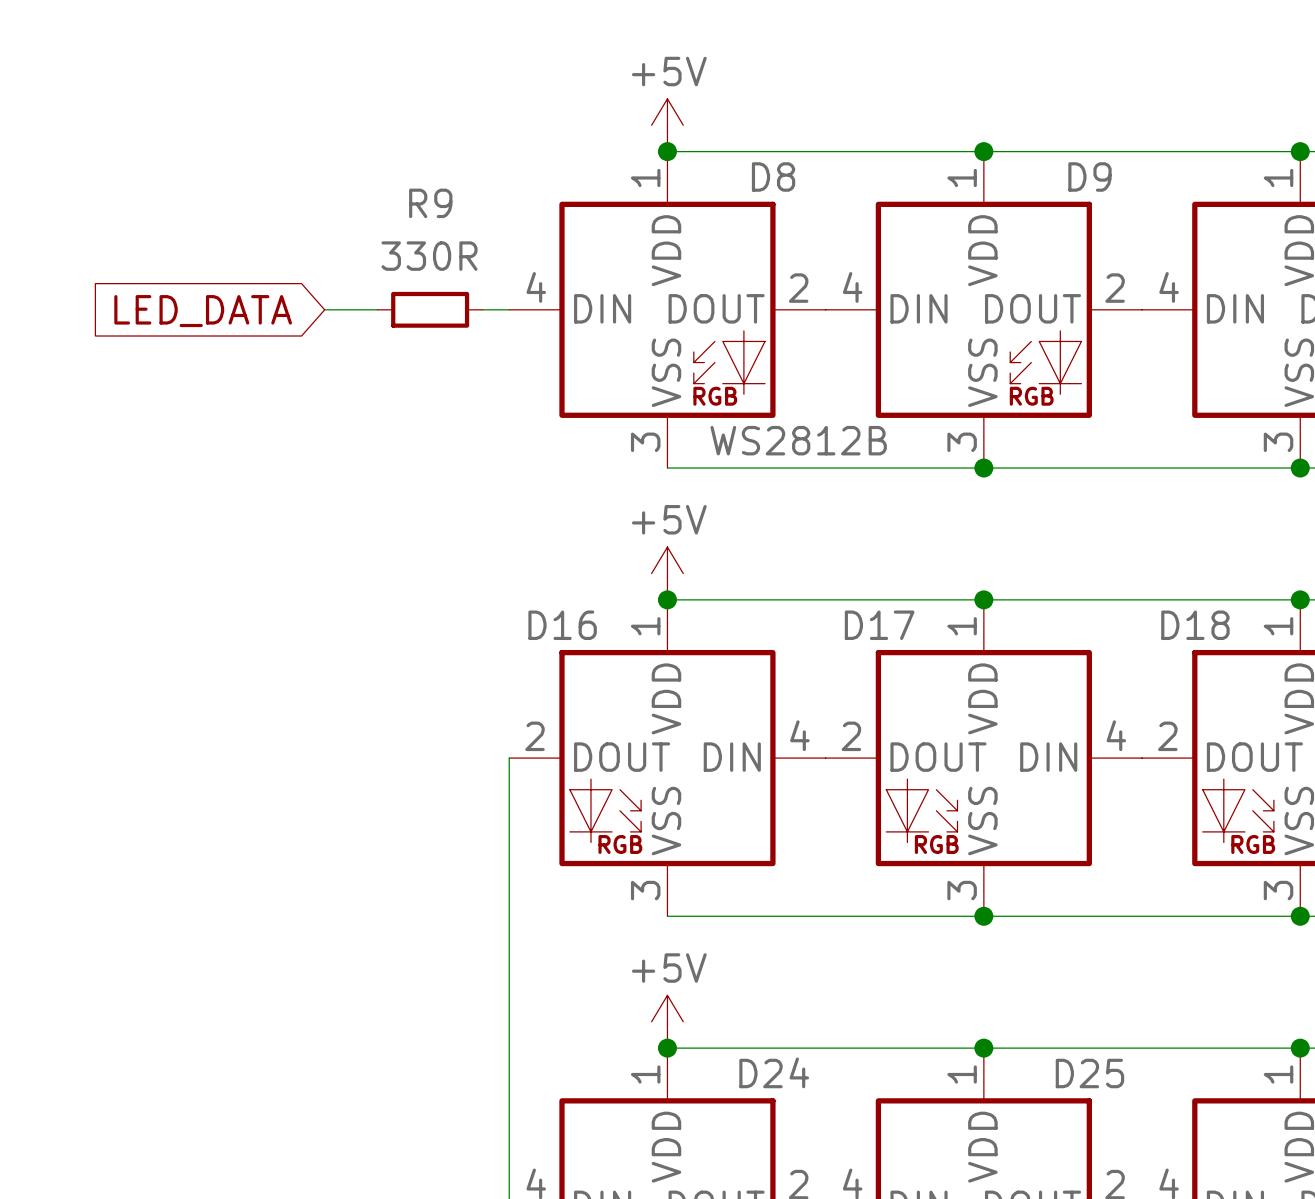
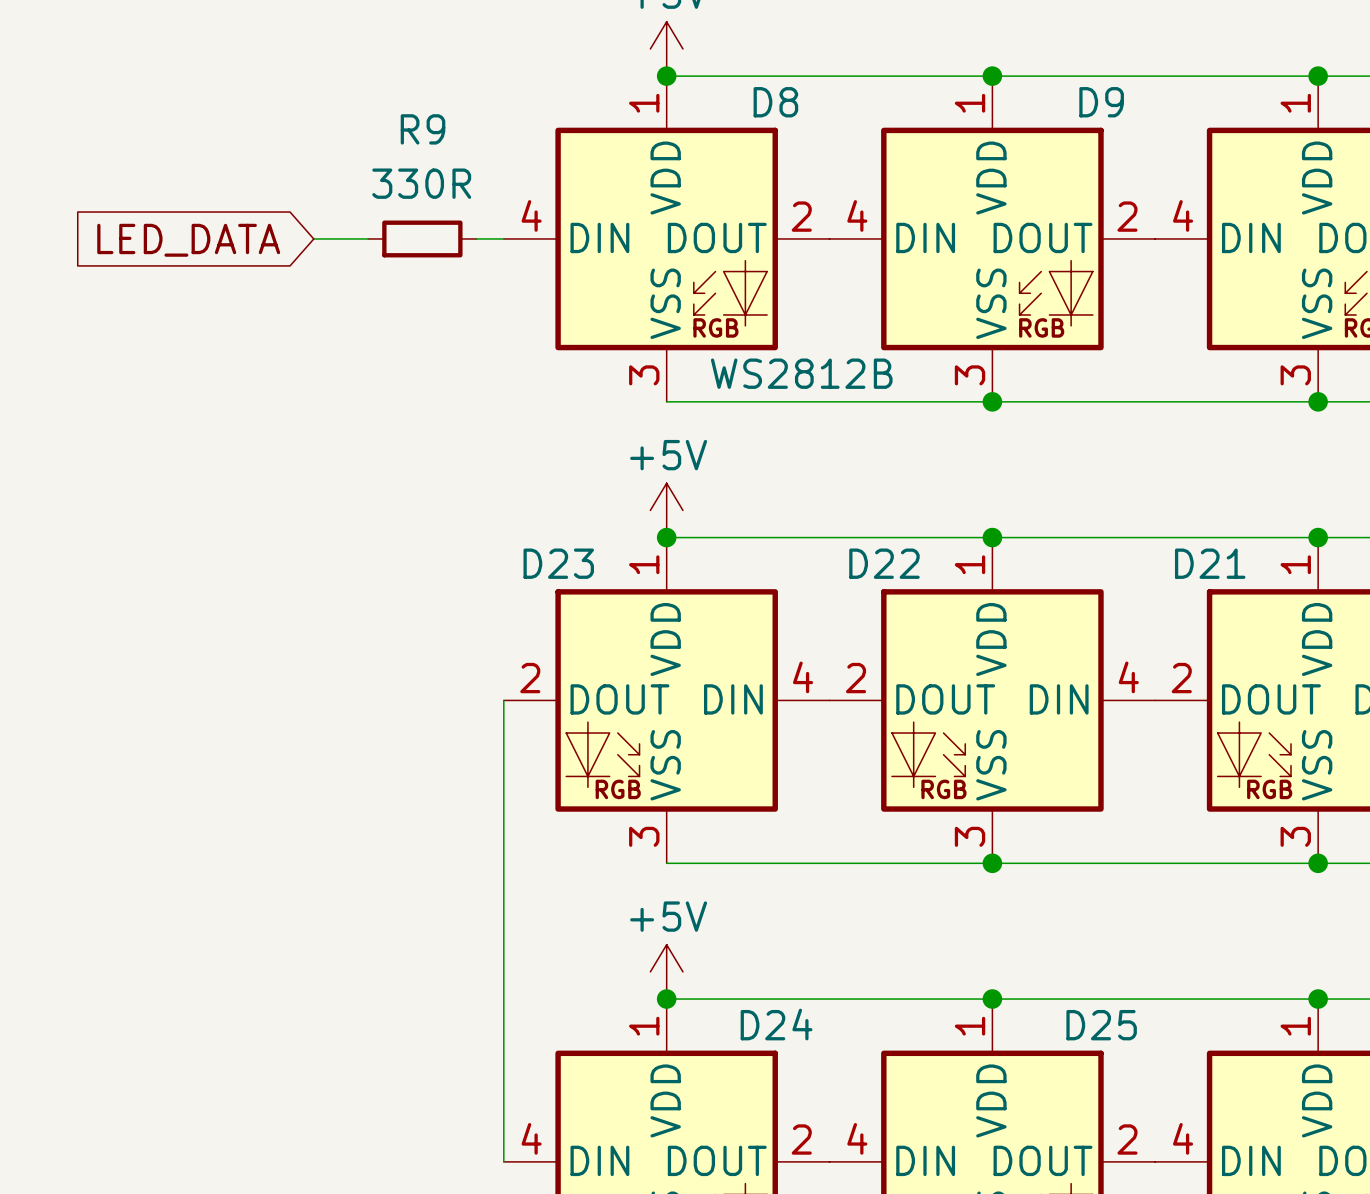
D16 name: D16 (562, 625) -> D23 (558, 563)
D17 name: D17 (879, 625) -> D22 (884, 563)
D18 name: D18 (1195, 625) -> D21 (1210, 563)

